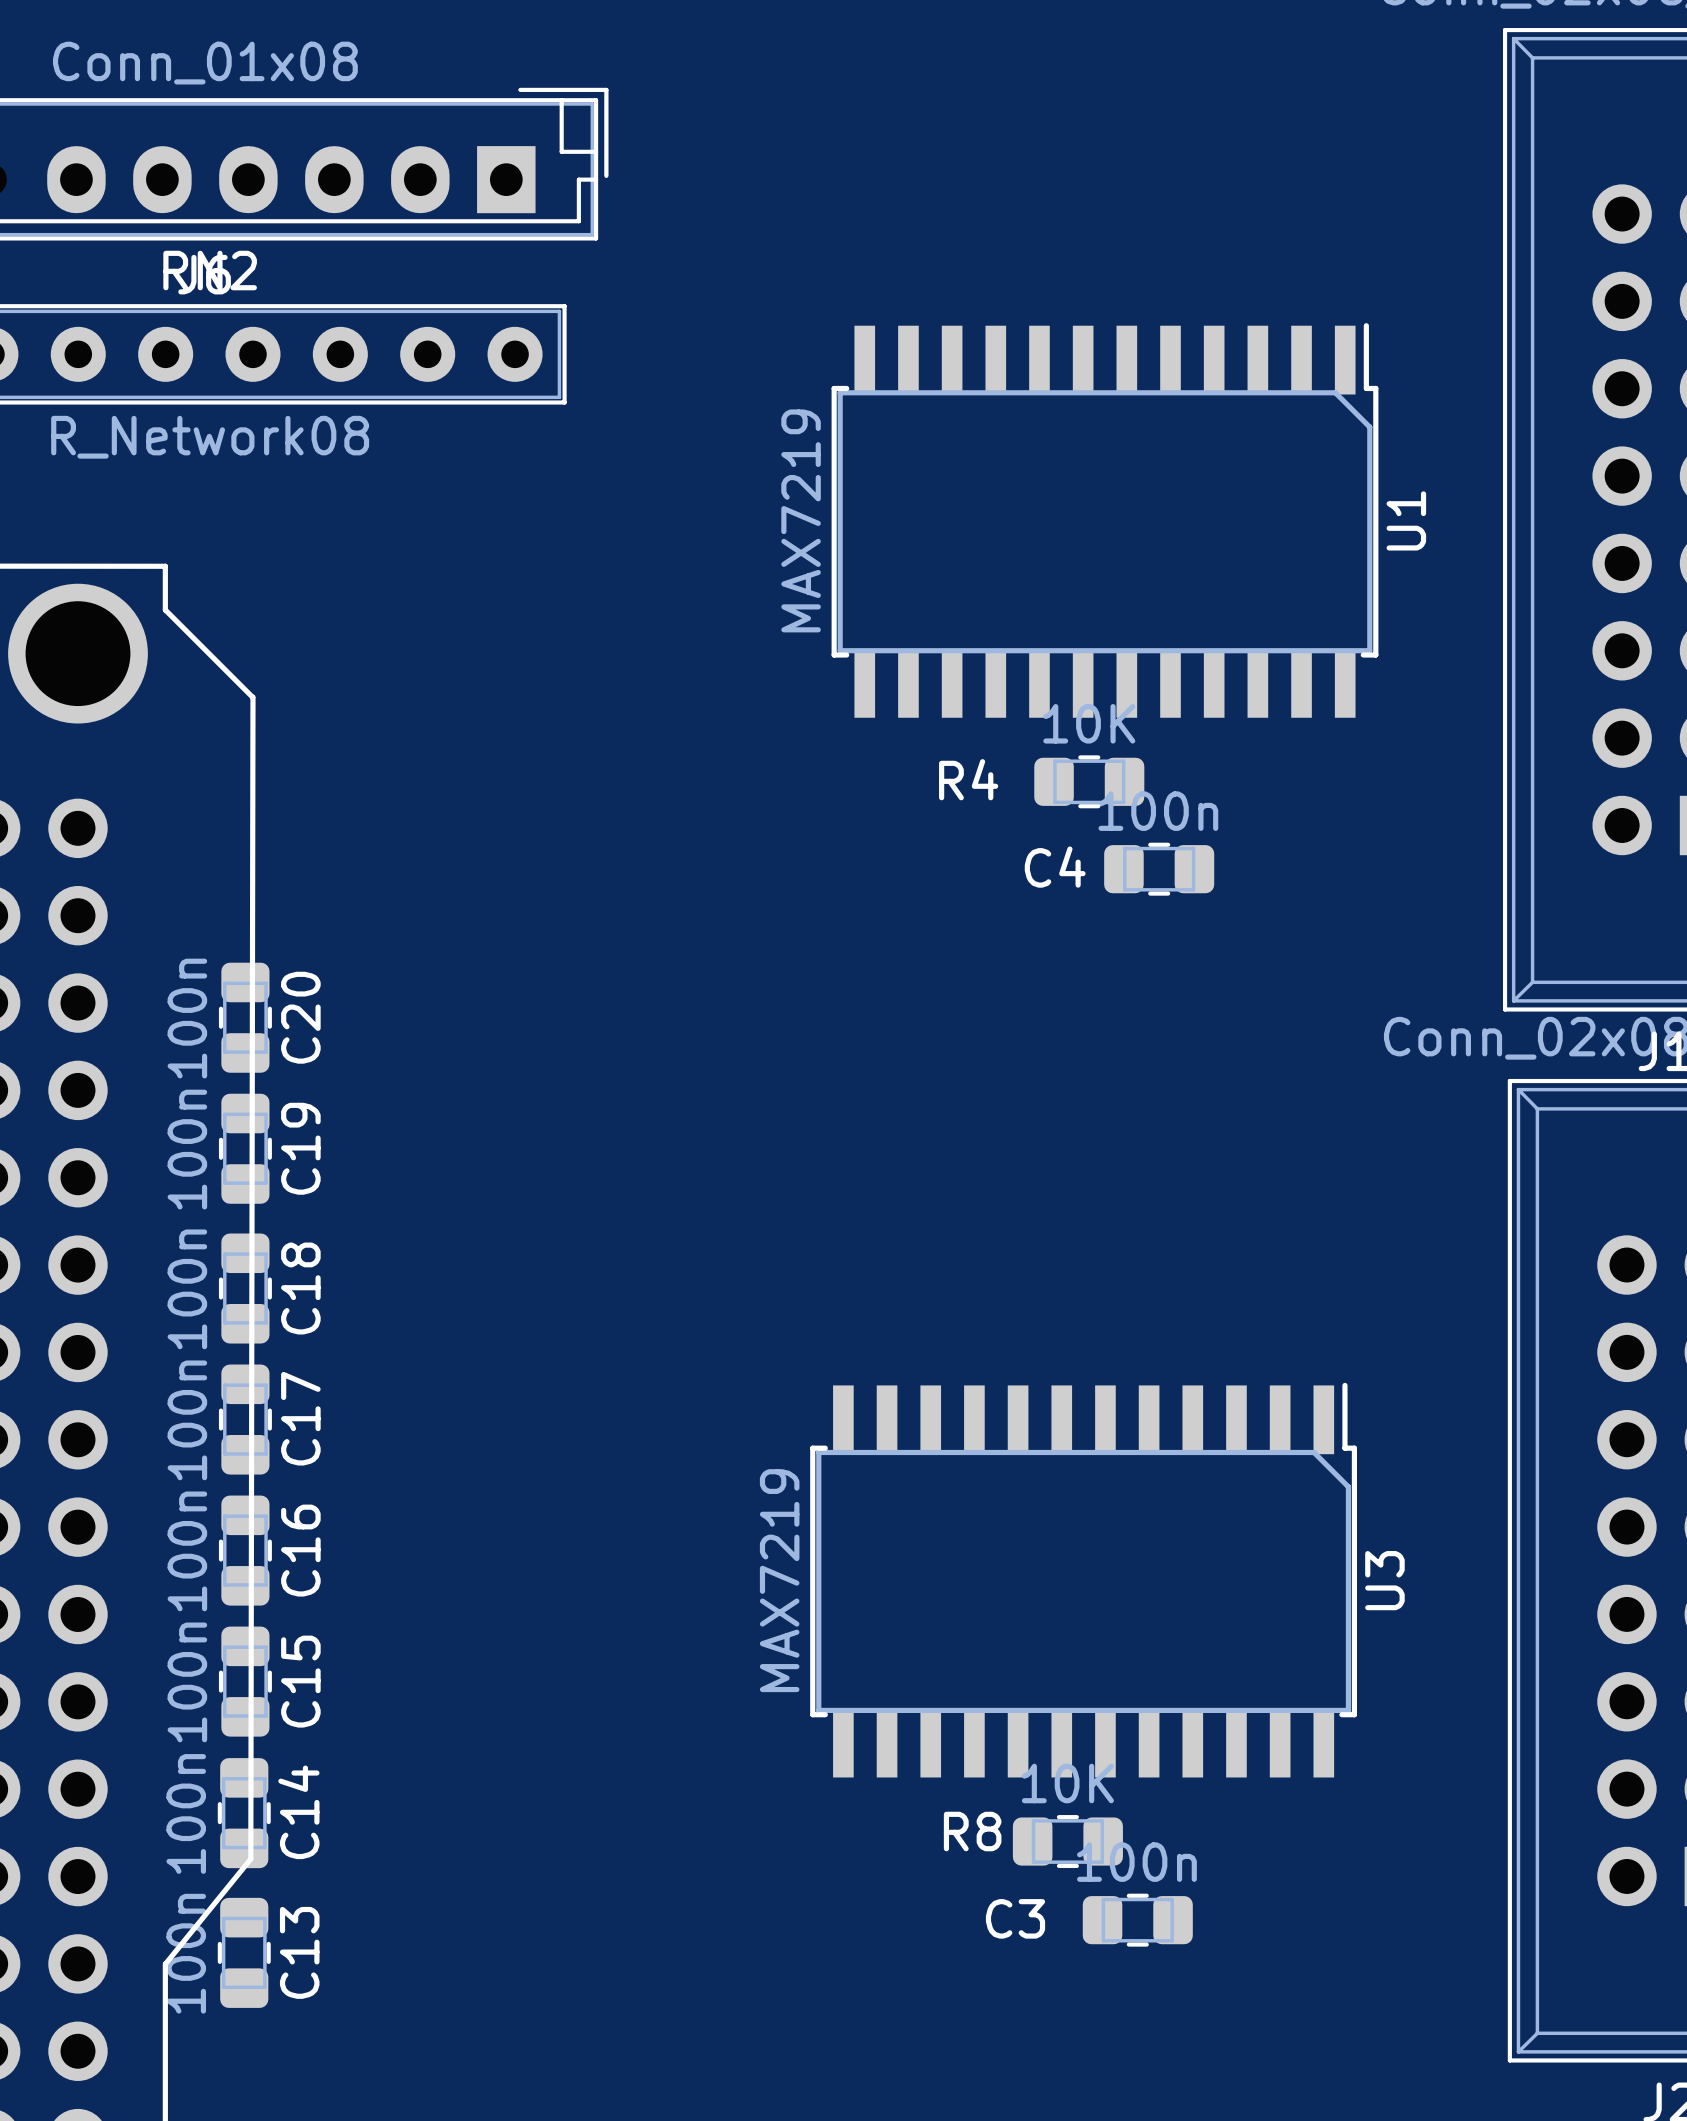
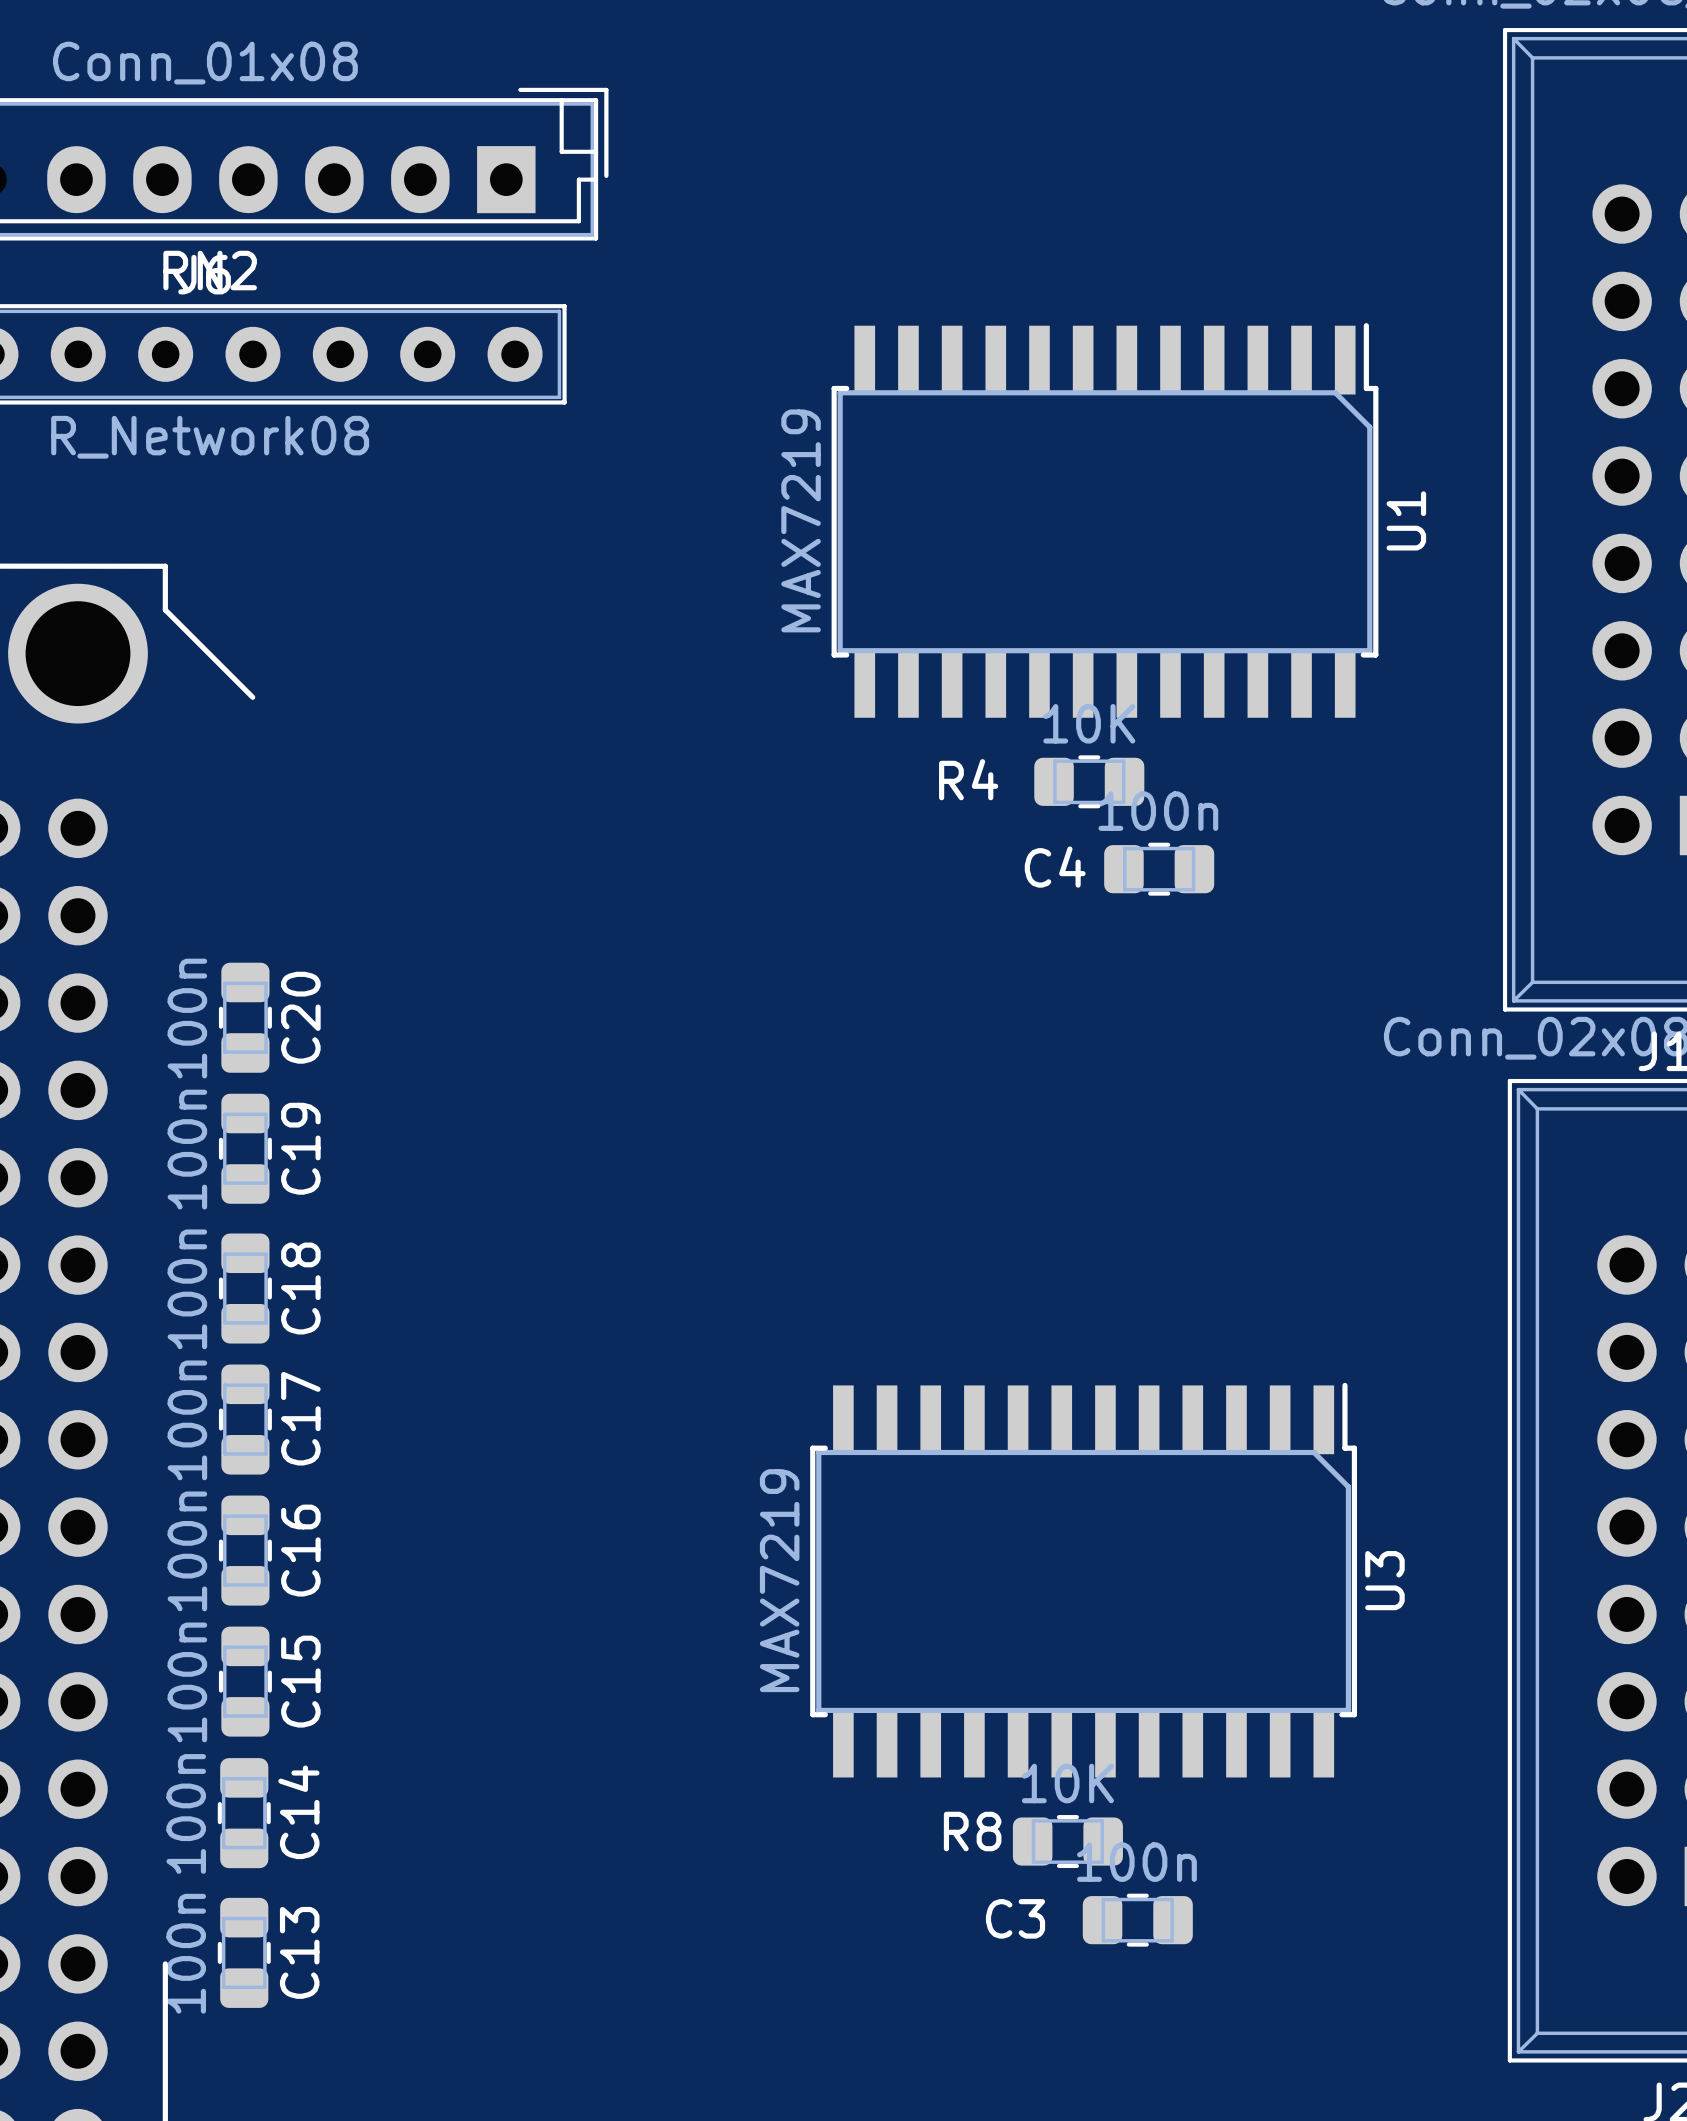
line: (252, 697) (250, 1858) (165, 1963) -> none

